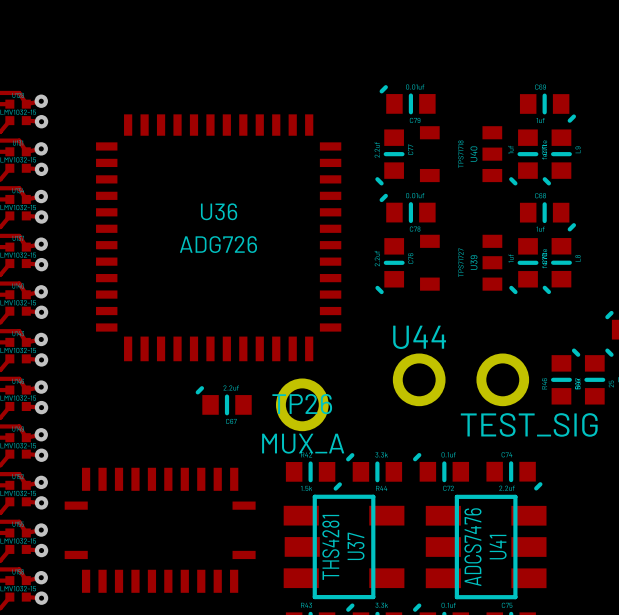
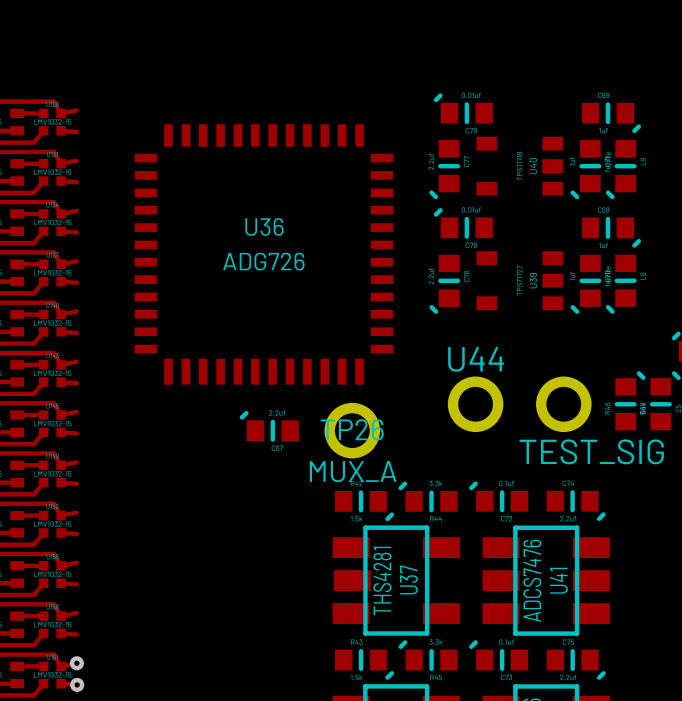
via: (41, 101) -> none
via: (41, 121) -> none
via: (41, 148) -> none
via: (41, 169) -> none
via: (41, 196) -> none
via: (41, 217) -> none
via: (41, 244) -> none
via: (41, 264) -> none
via: (41, 291) -> none
via: (41, 312) -> none
via: (41, 339) -> none
via: (41, 359) -> none
via: (41, 387) -> none
via: (41, 407) -> none
via: (41, 434) -> none
via: (41, 455) -> none
via: (41, 482) -> none
via: (41, 502) -> none
via: (41, 530) -> none
part: (160, 530) -> none
via: (41, 550) -> none
via: (41, 577) -> none
via: (41, 598) -> none

